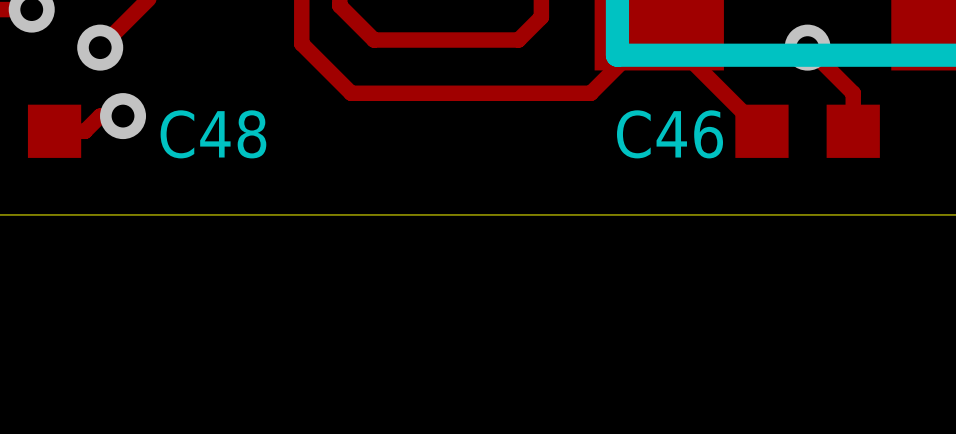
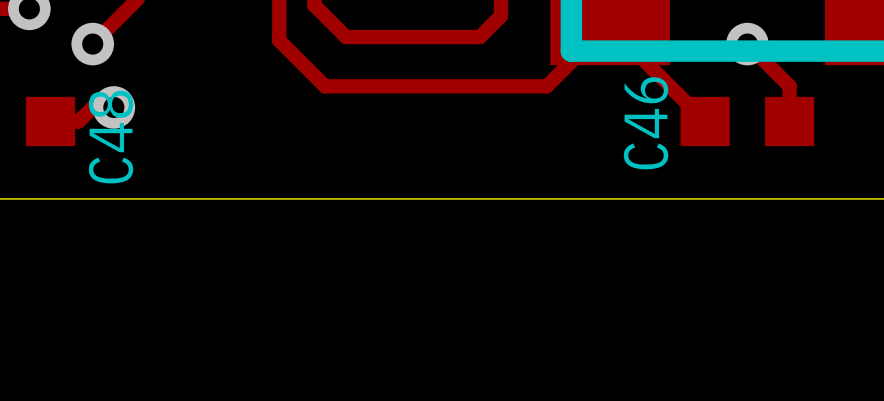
C48 name rotation: 0° (213, 134) -> 90° counterclockwise (111, 137)
C46 name rotation: 0° (670, 134) -> 90° counterclockwise (646, 123)

